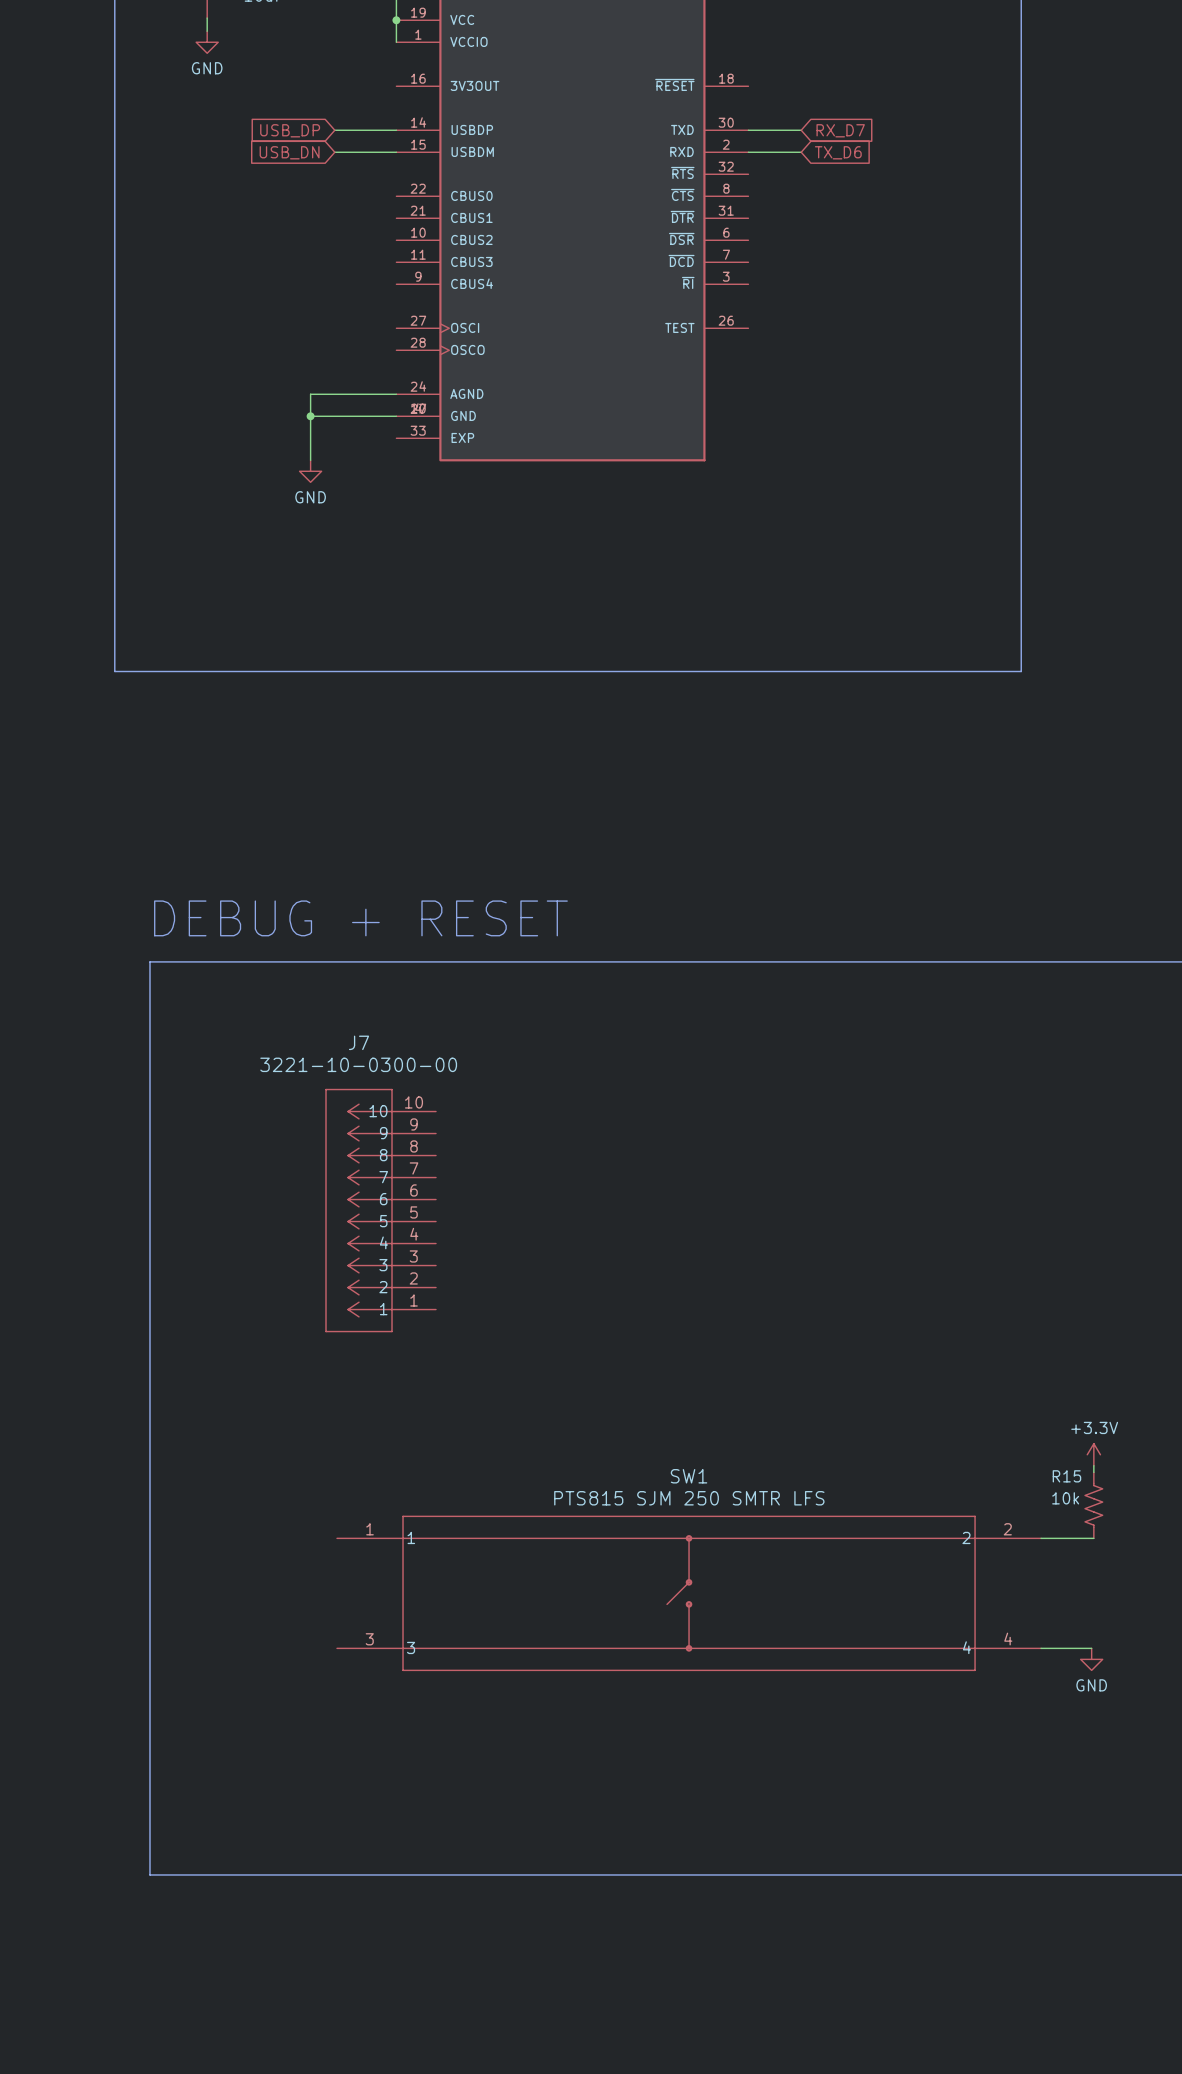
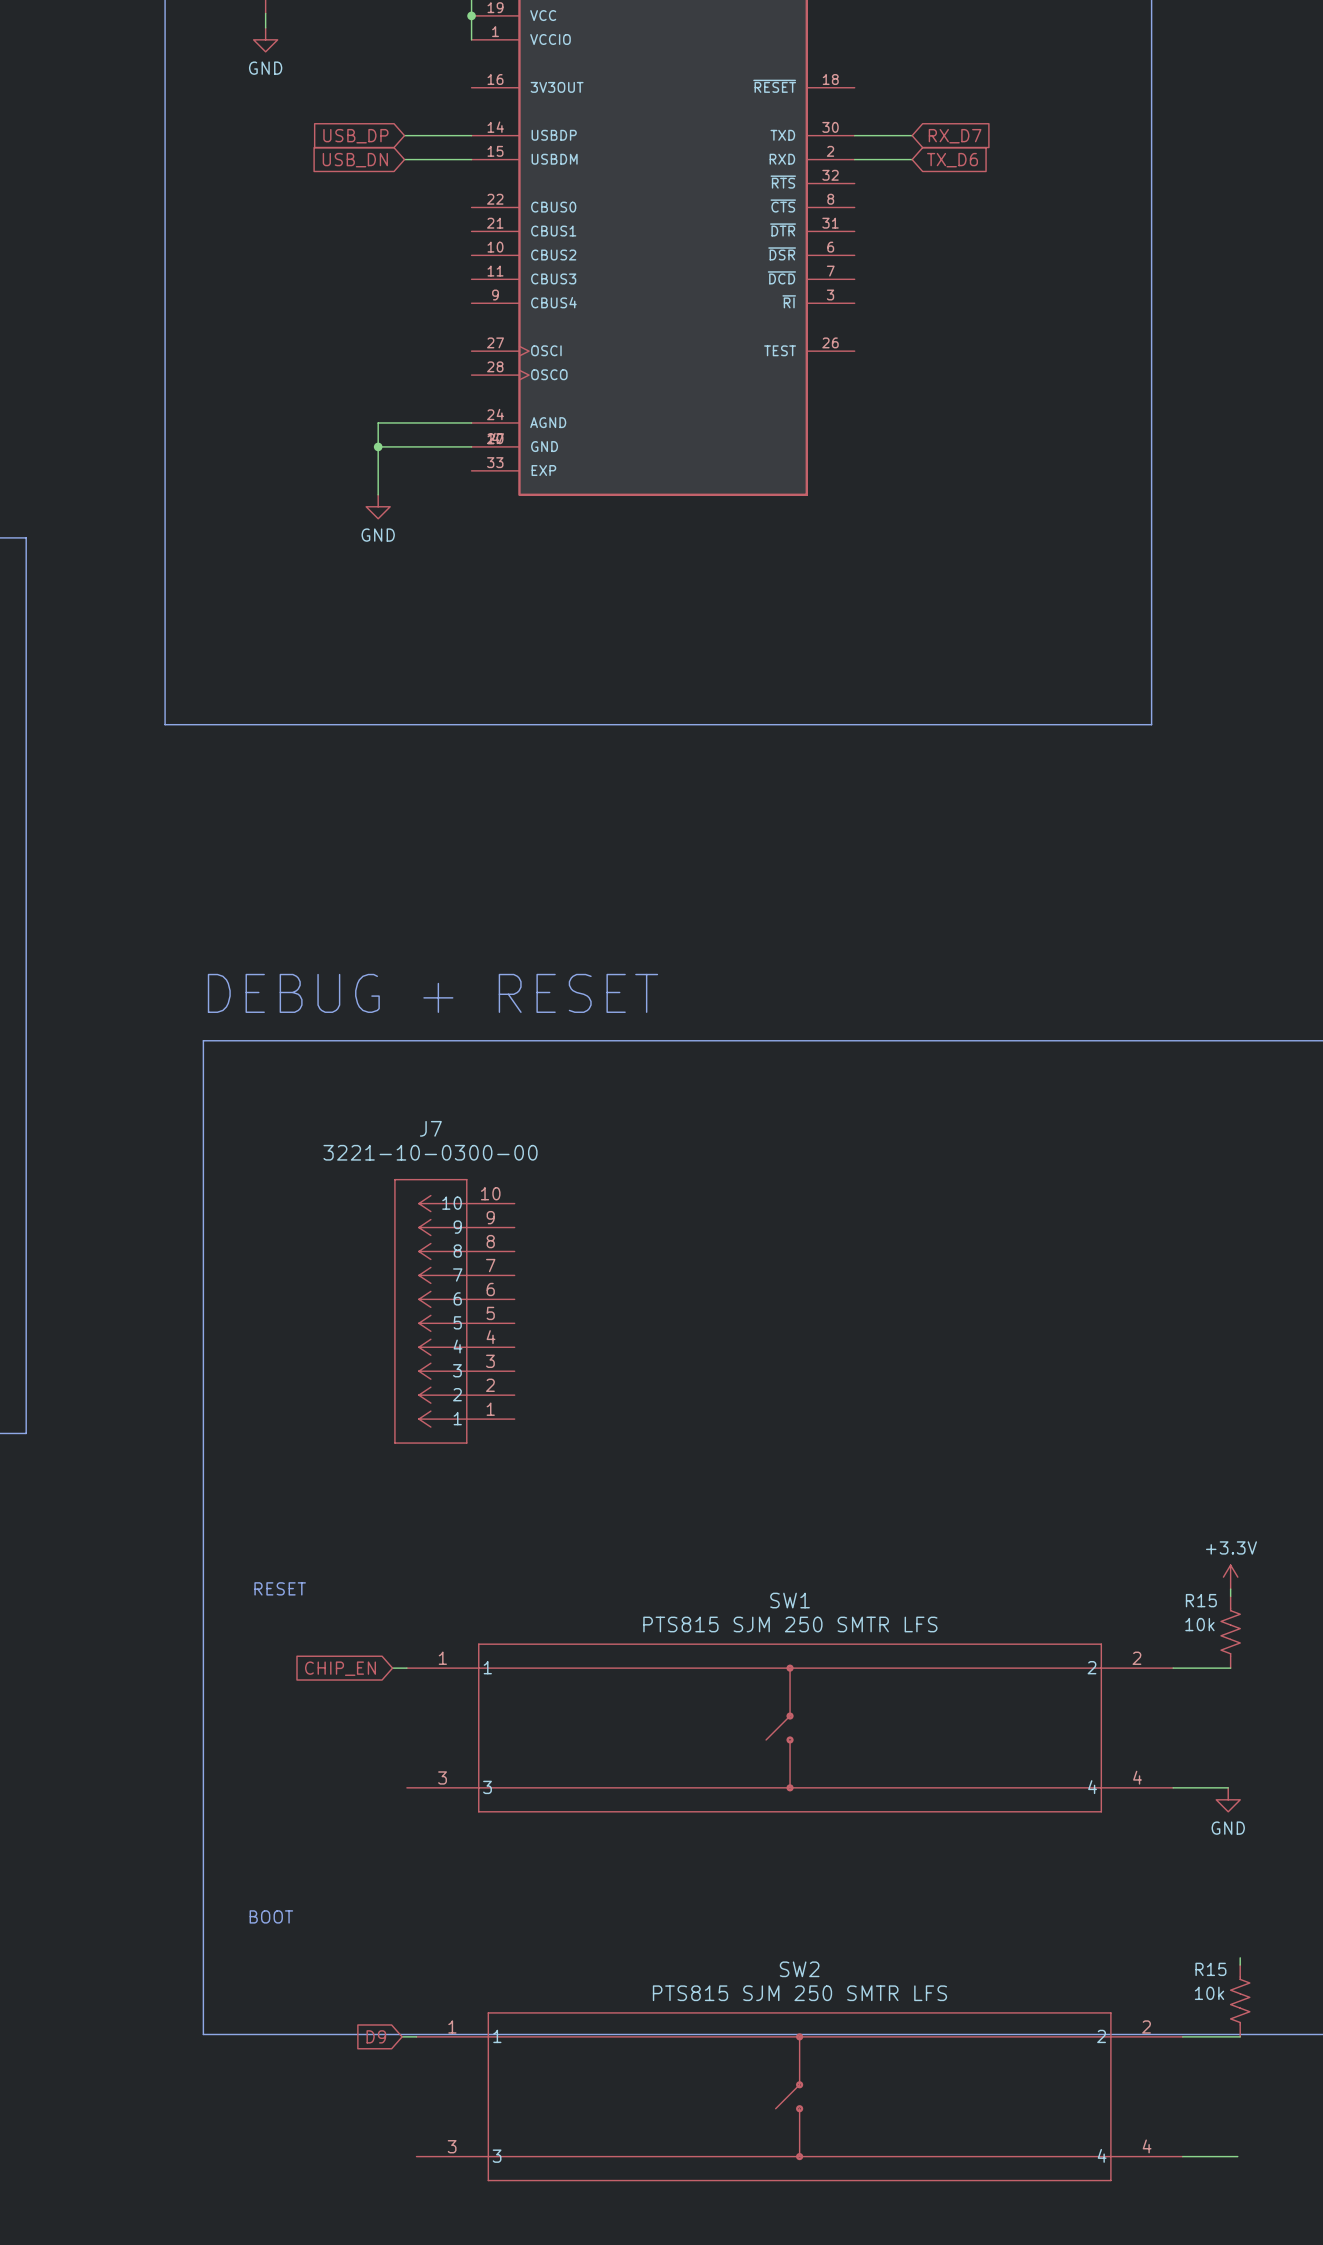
text: none -> RESET (280, 1588)
global label: none -> CHIP_EN (340, 1668)
wire: none -> (392, 1668) (406, 1668)
text: none -> BOOT (271, 1916)
wire: none -> (1240, 1957) (1240, 1965)
R15: none -> 10k (1240, 2000)
global label: none -> D9 (376, 2036)
wire: none -> (402, 2036) (416, 2036)
wire: none -> (1182, 2036) (1240, 2036)
SW2: none -> PTS815 SJM 250 SMTR LFS (799, 2096)
wire: none -> (1182, 2156) (1237, 2156)

